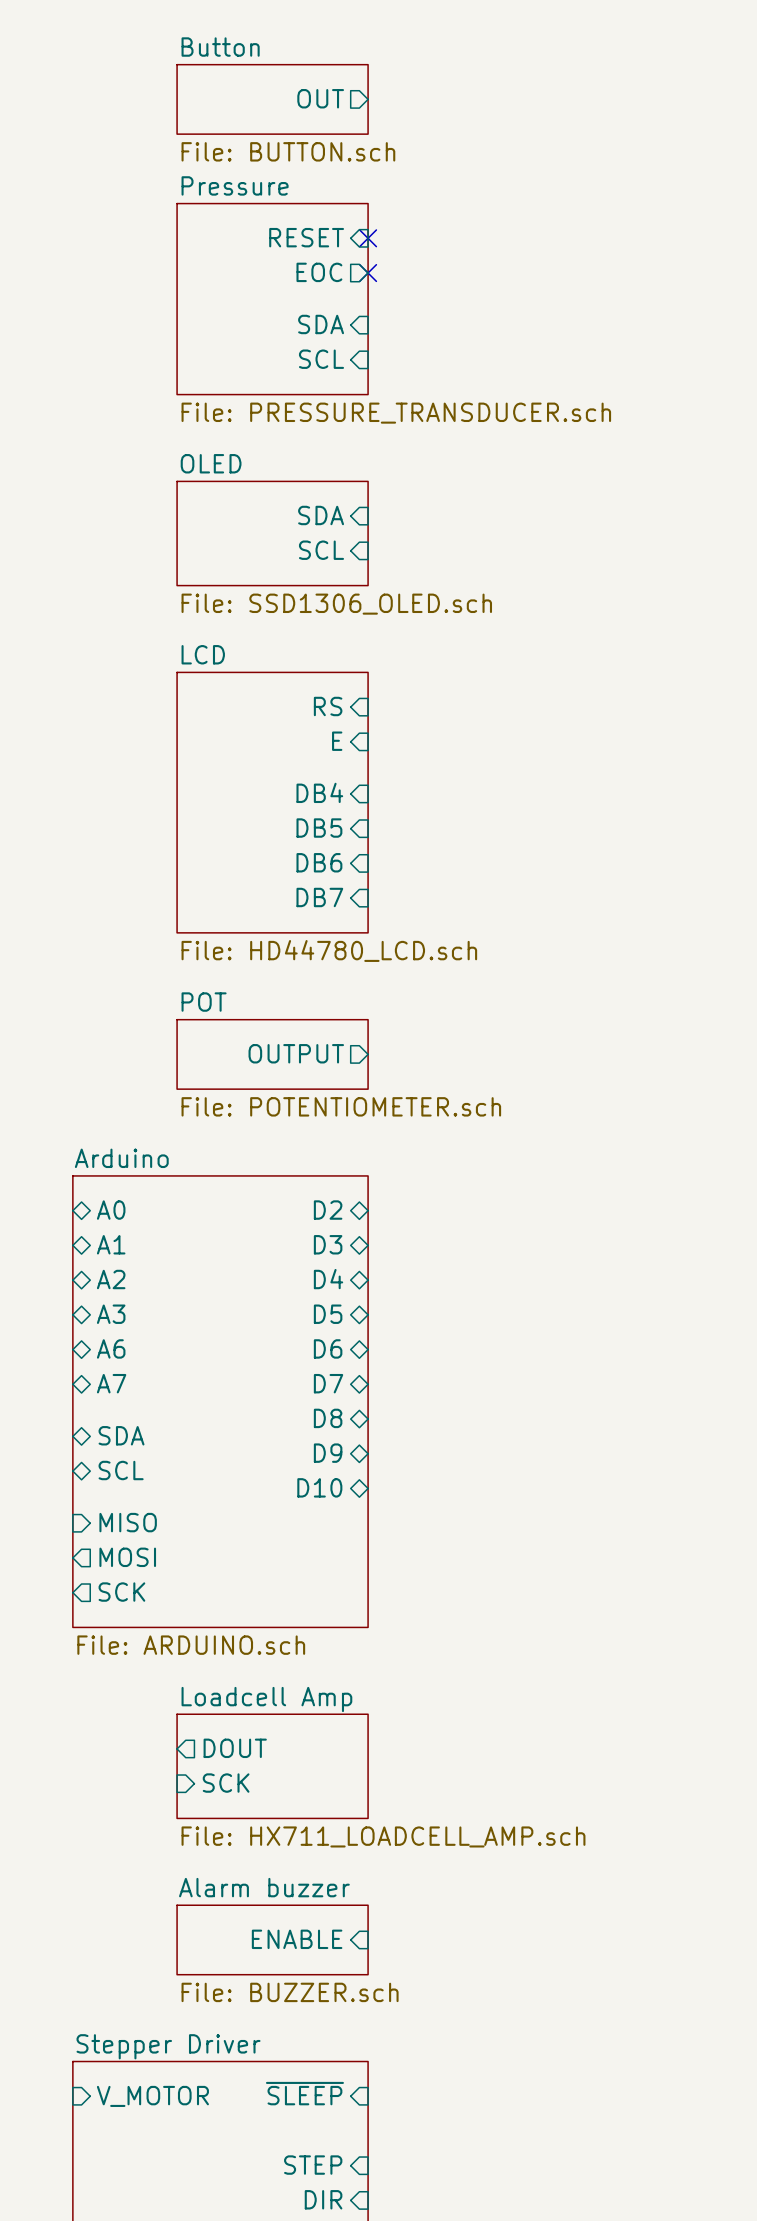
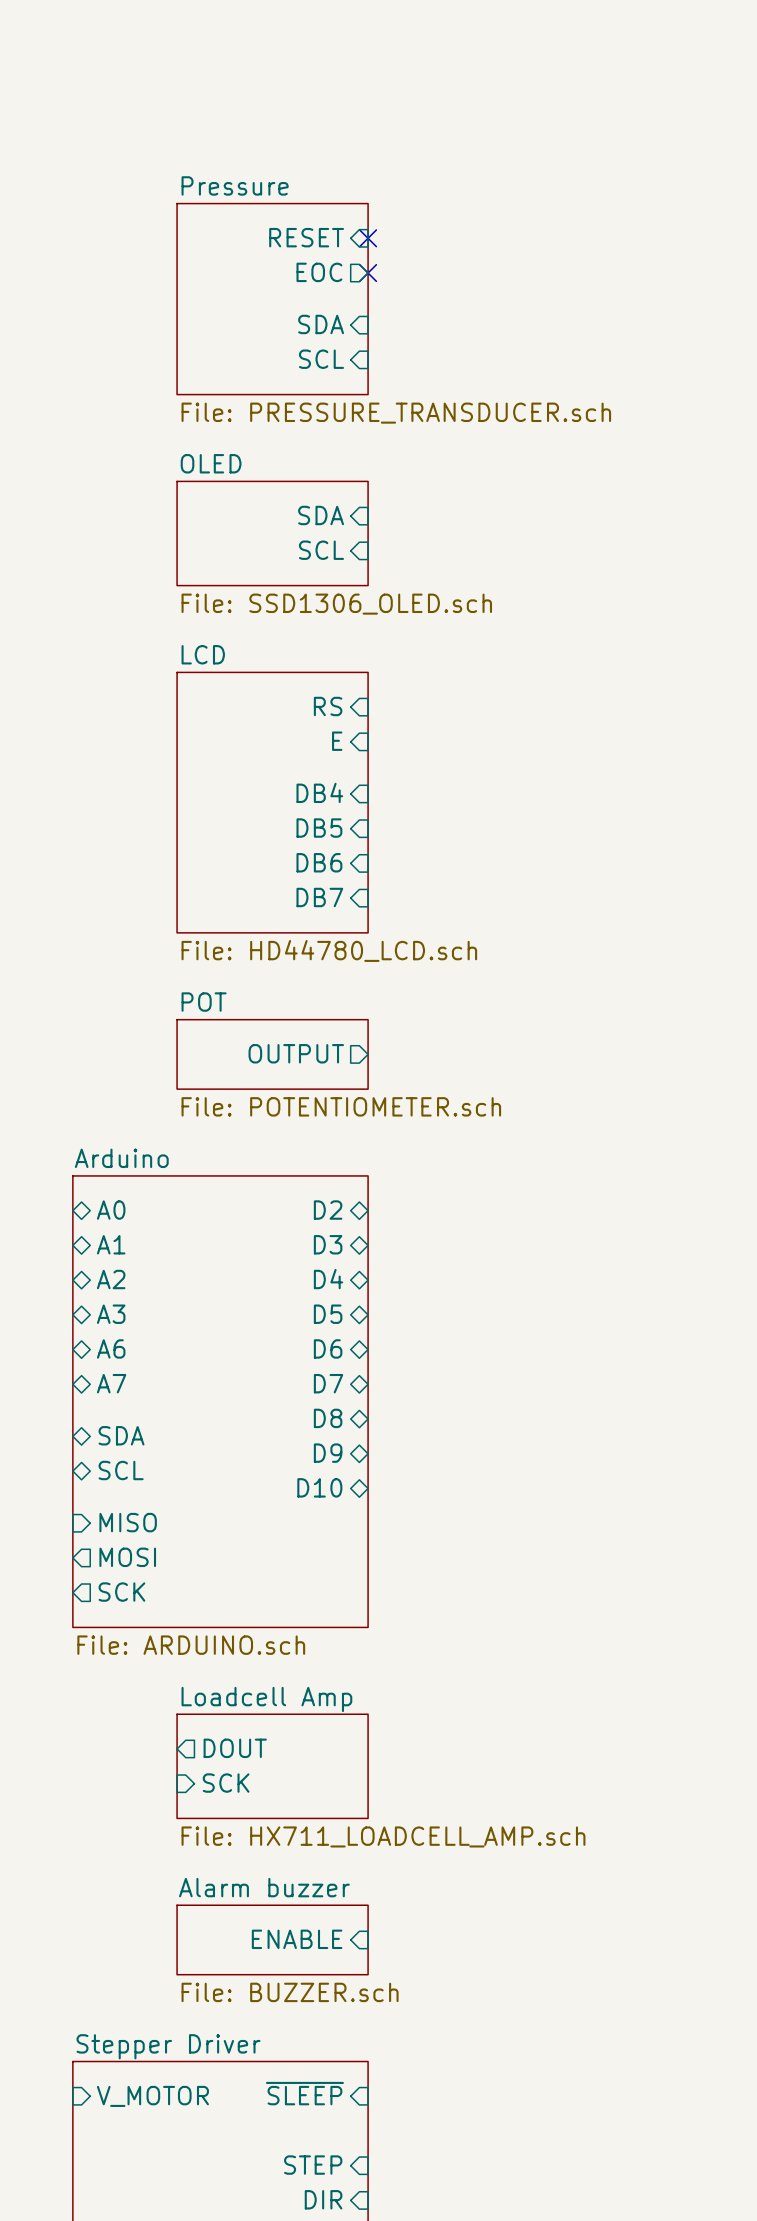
sheet pin: OUT (320, 98) -> none
sheet Button: File: BUTTON.sch (272, 99) -> none

